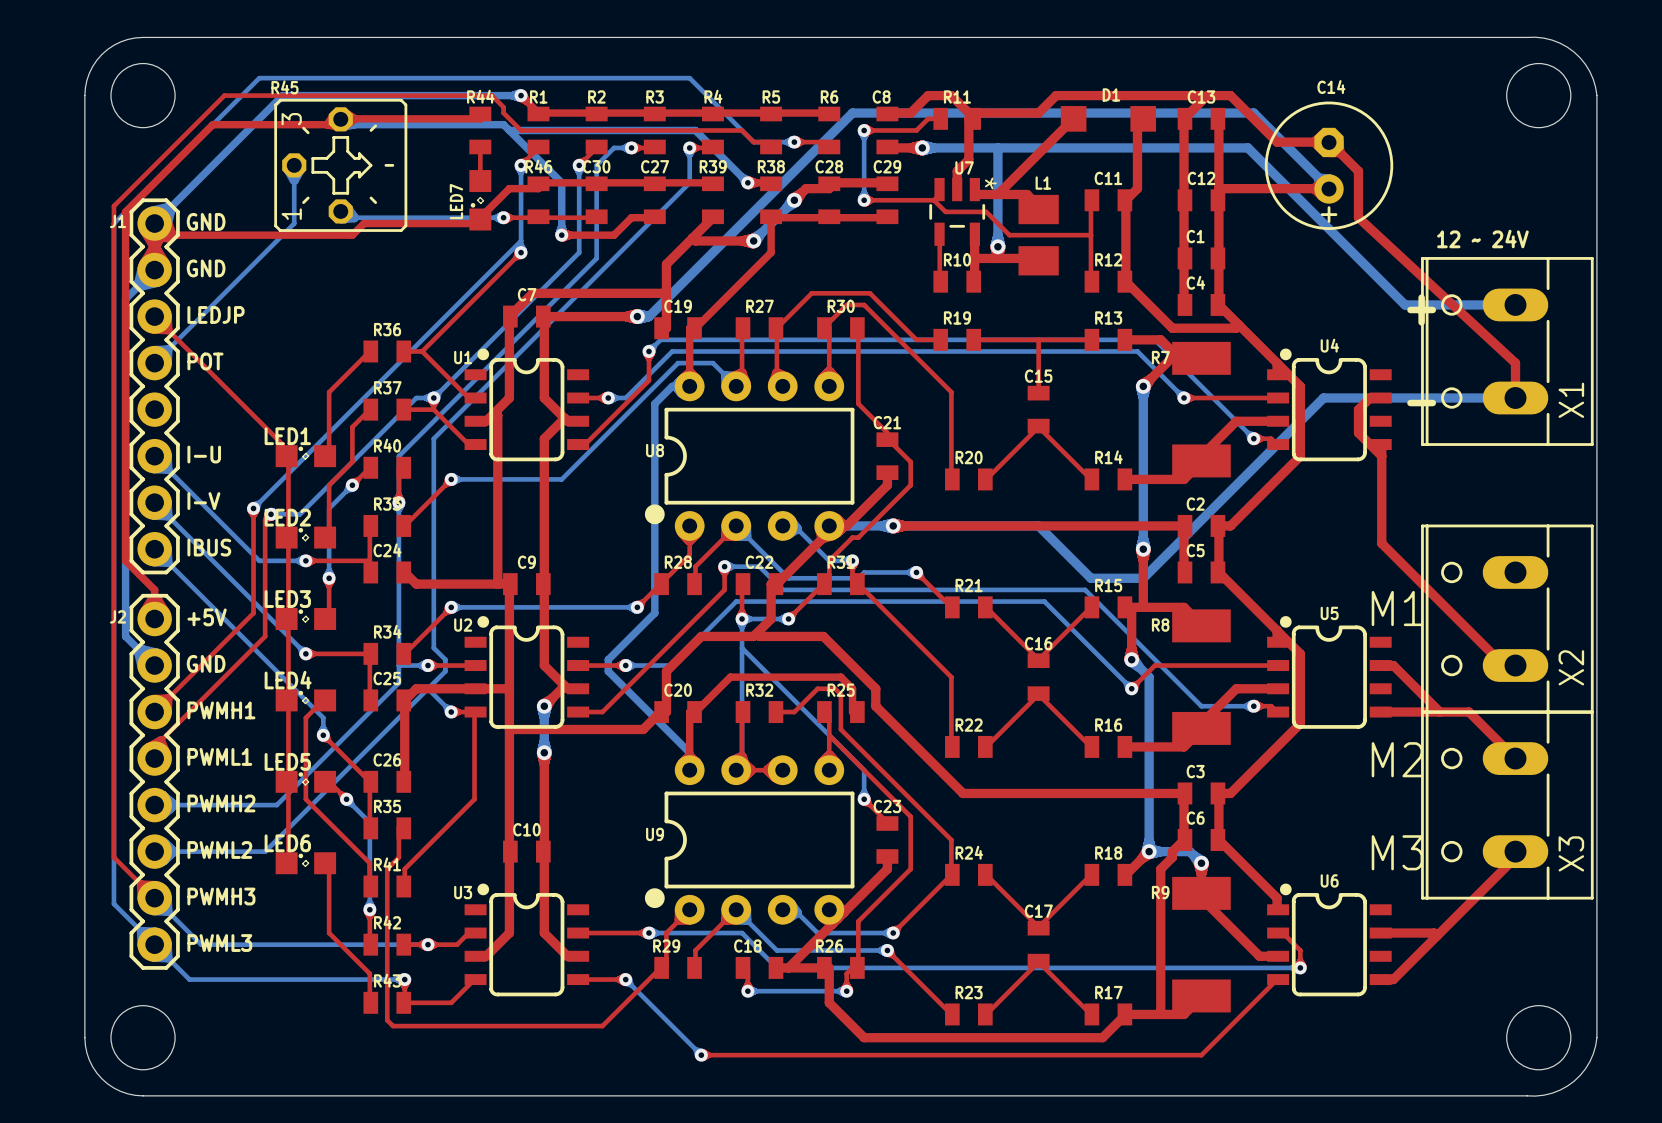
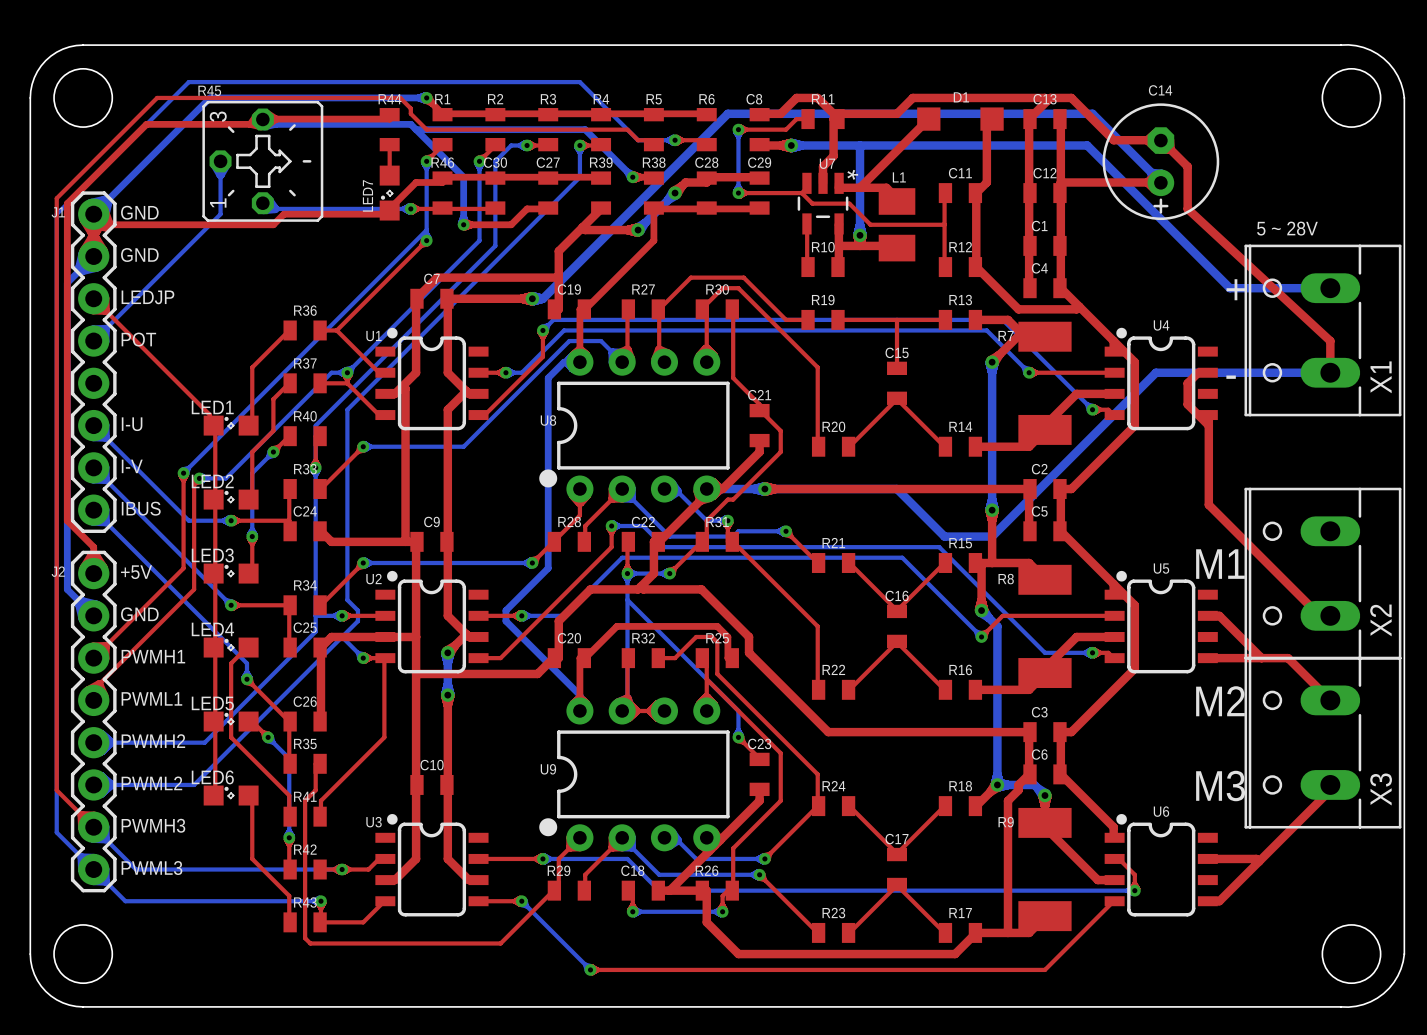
text: 12 ~ 24V (1482, 239) -> 5 ~ 28V (1287, 228)

